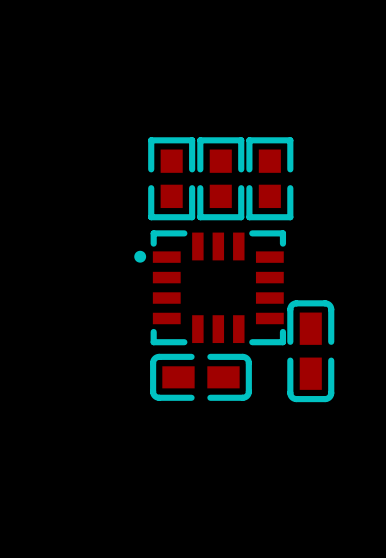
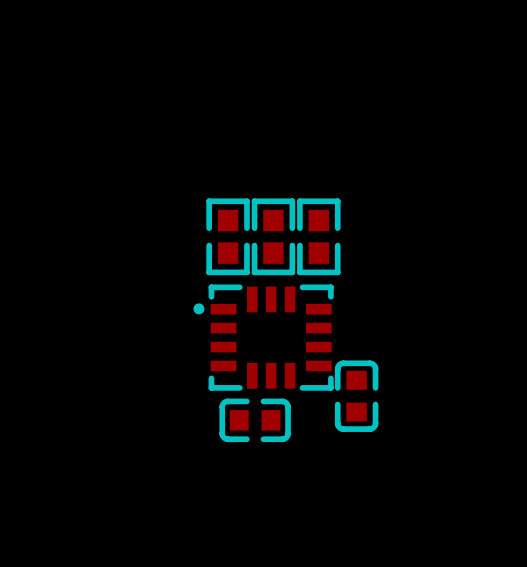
part footprint: [287, 300, 335, 403] -> [334, 360, 379, 432]
part footprint: [150, 353, 252, 401] -> [219, 398, 291, 443]

